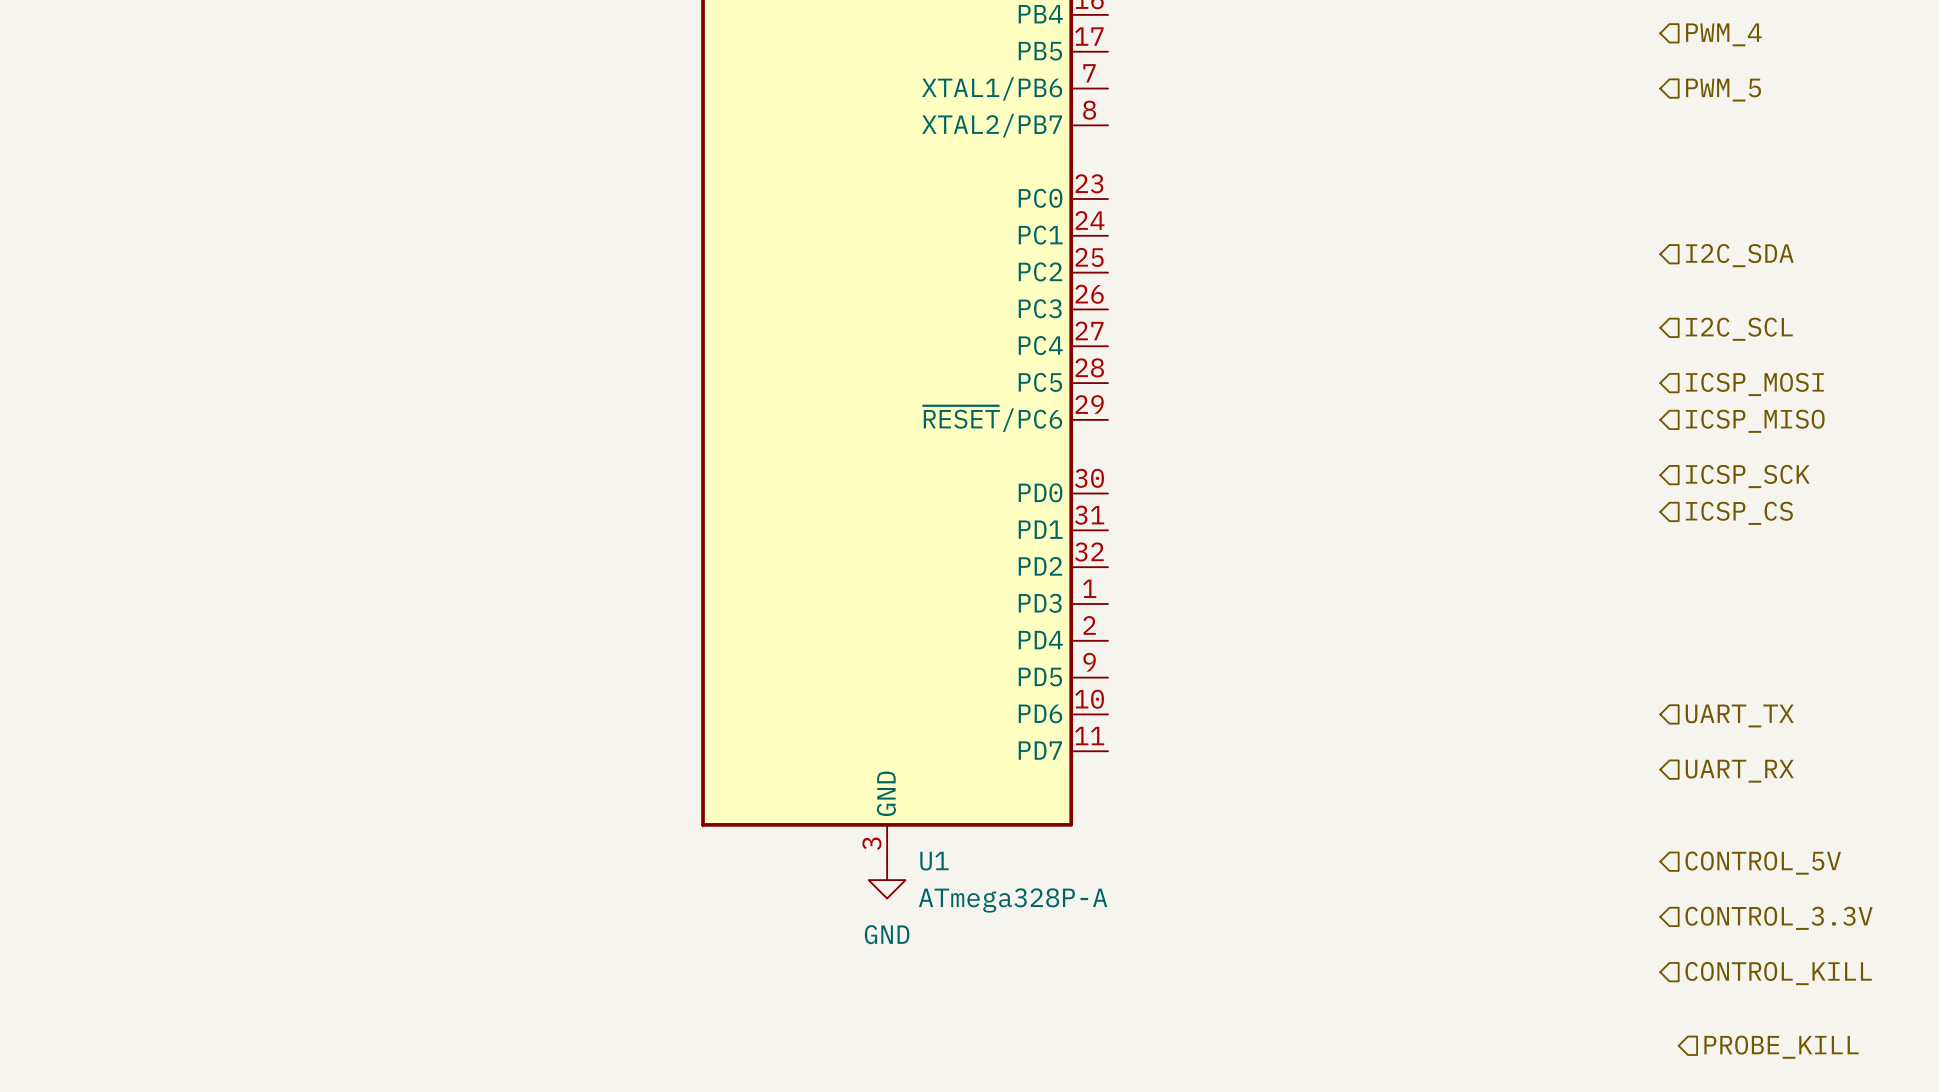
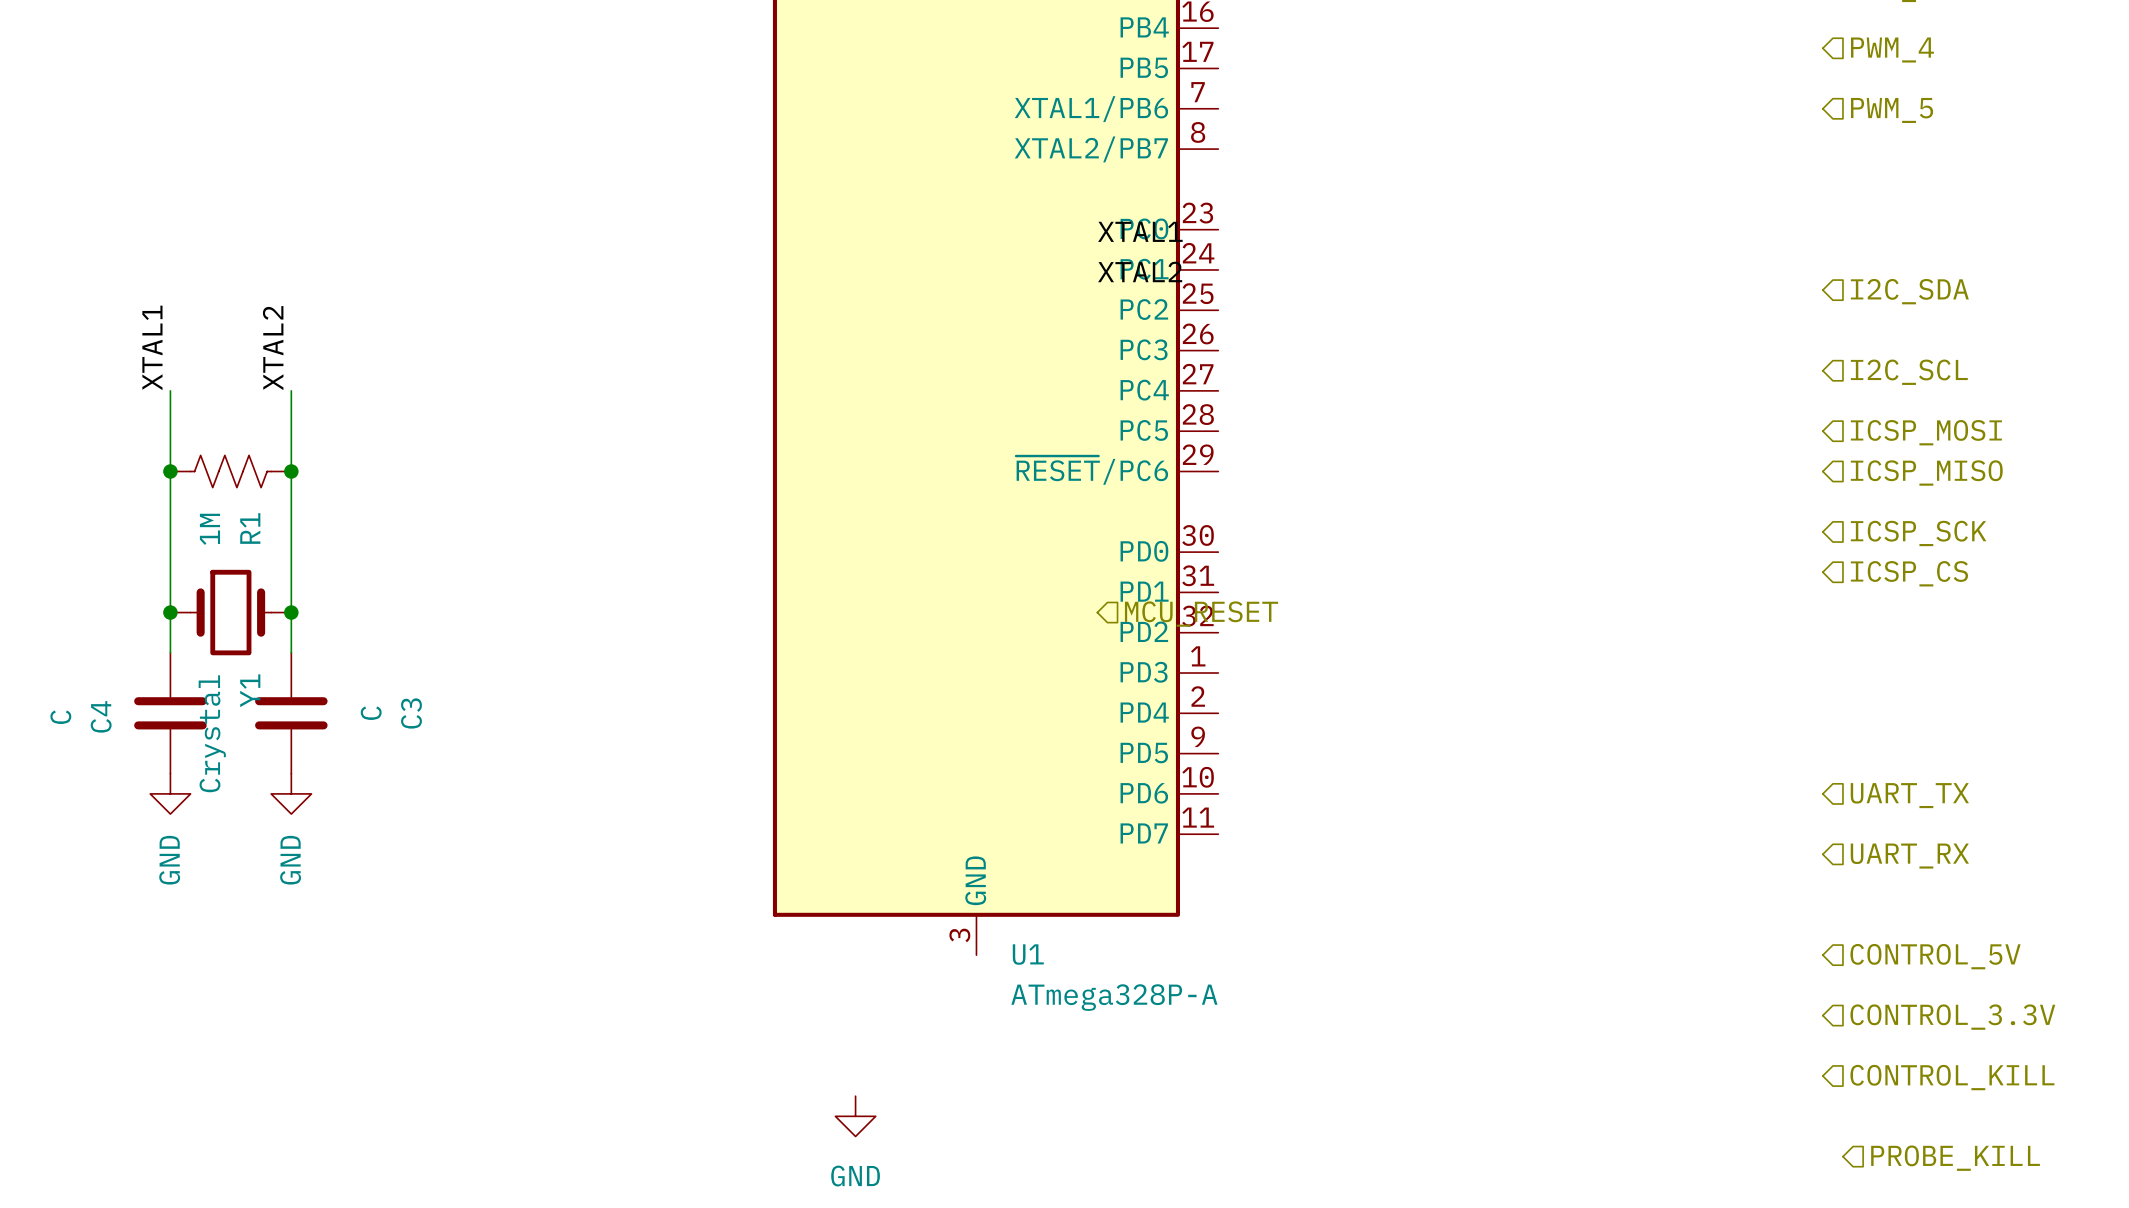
label: none -> XTAL1 (1140, 231)
label: none -> XTAL2 (1140, 271)
label: none -> XTAL1 (152, 347)
label: none -> XTAL2 (273, 348)
wire: none -> (170, 390) (170, 652)
wire: none -> (291, 390) (291, 652)
junction: none -> (170, 471)
R1: none -> 1M (230, 471)
junction: none -> (291, 471)
junction: none -> (170, 612)
Y1: none -> Crystal (230, 612)
junction: none -> (291, 612)
hierarchical label: none -> MCU_RESET (1201, 614)
C4: none -> C (170, 713)
C3: none -> C (291, 713)
power symbol: none -> GND (170, 793)
power symbol: none -> GND (291, 793)
power symbol position: GND (887, 880) -> GND (855, 1116)

